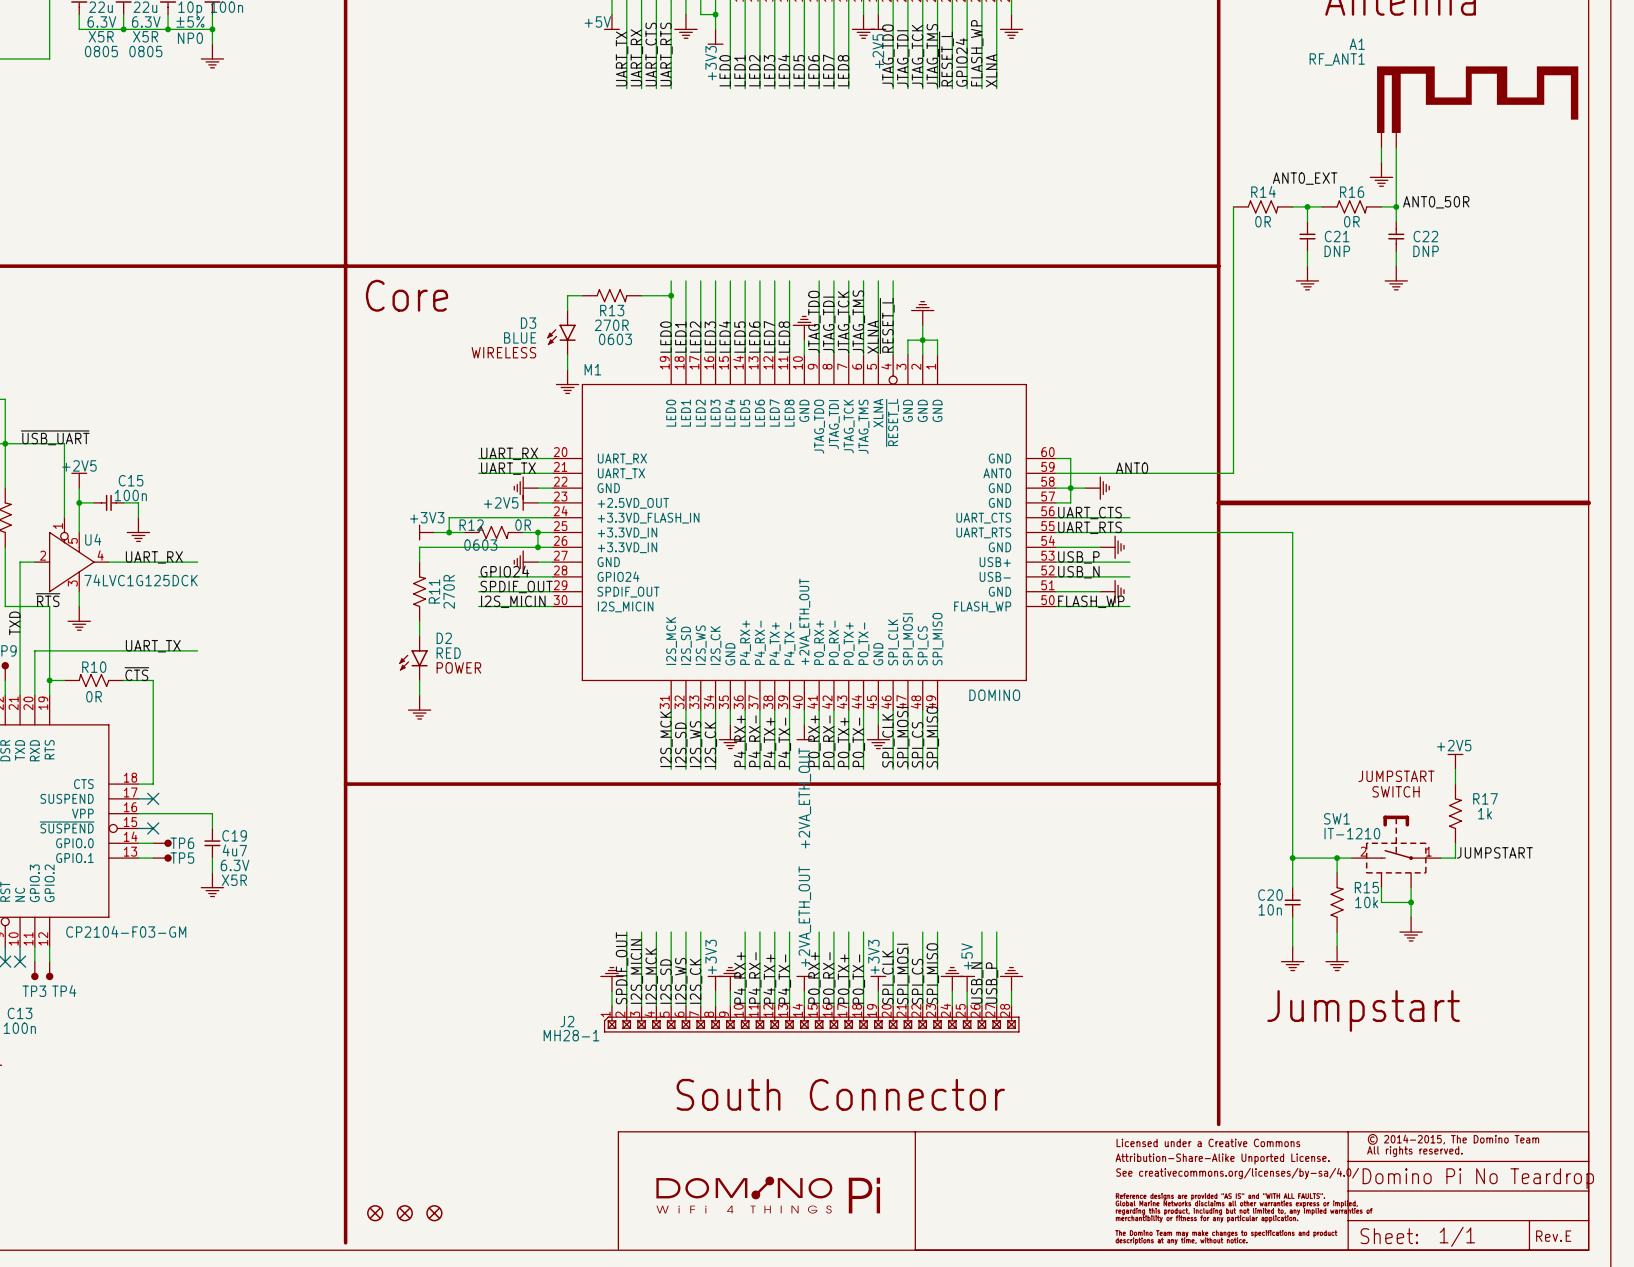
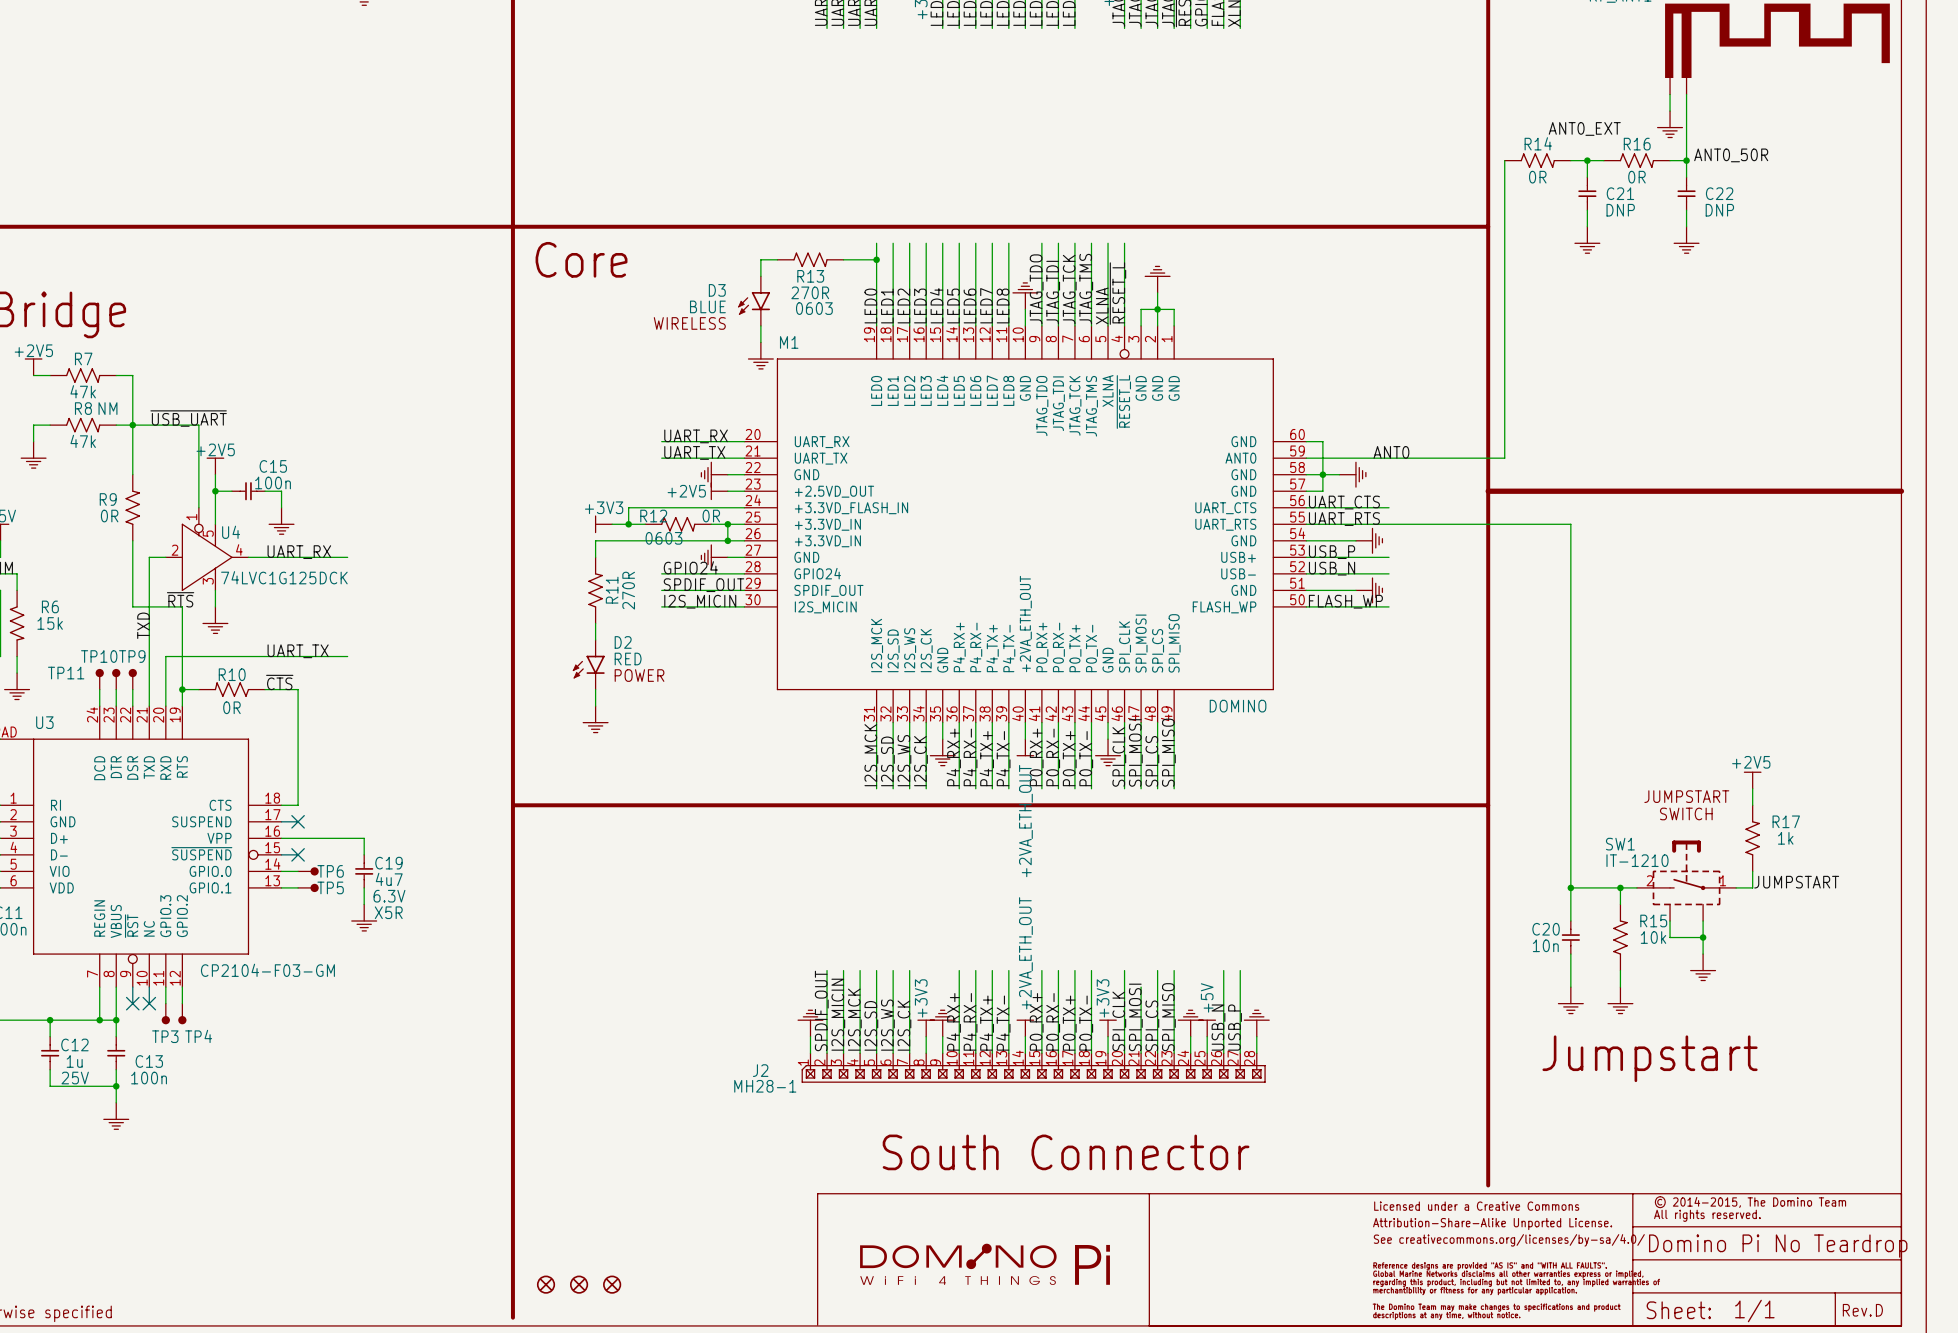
text: E (1568, 1236) -> D (1879, 1310)

